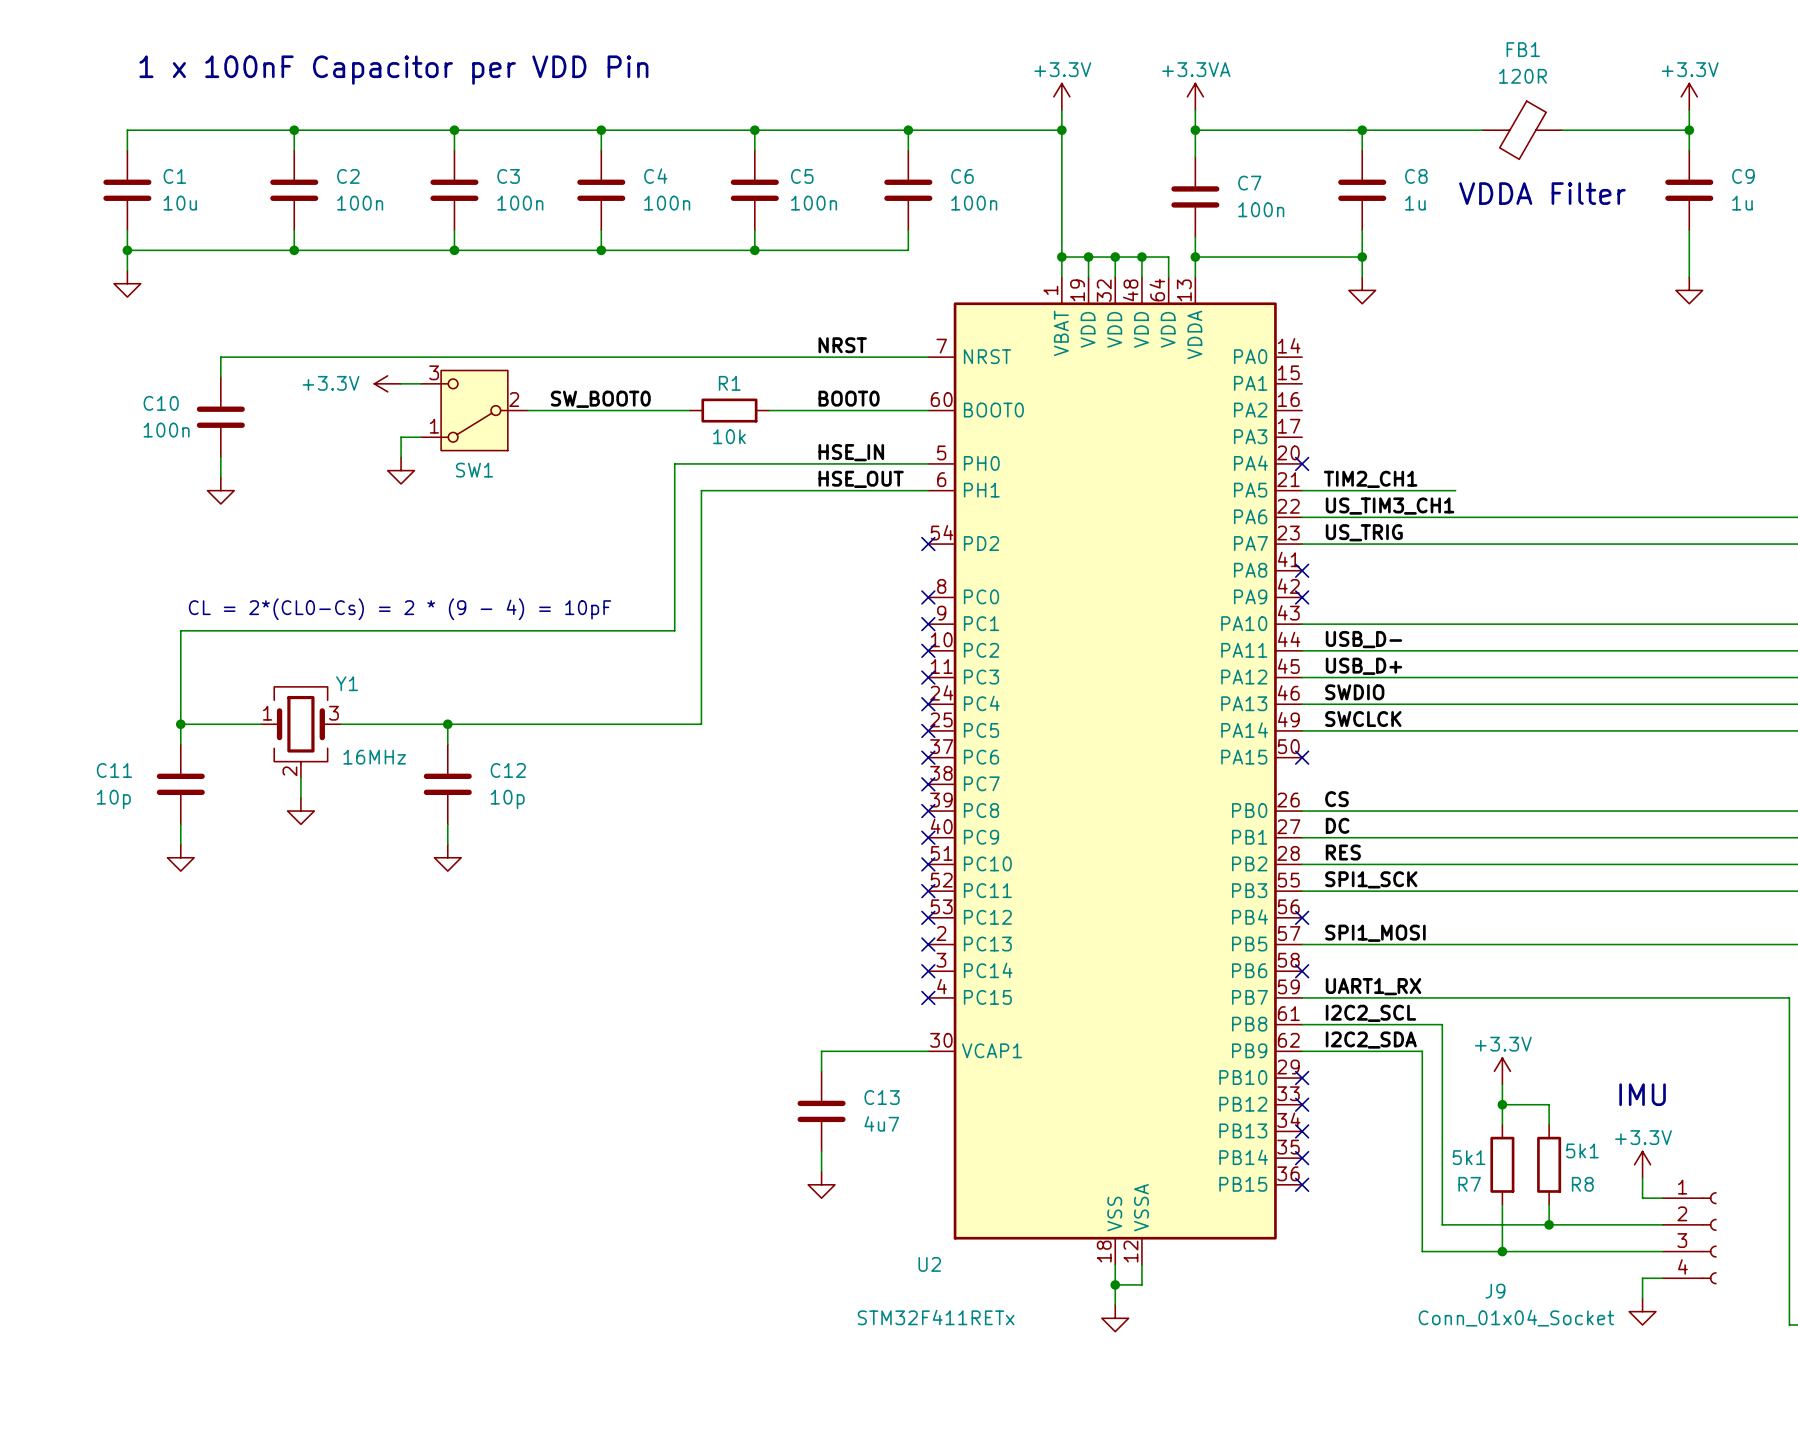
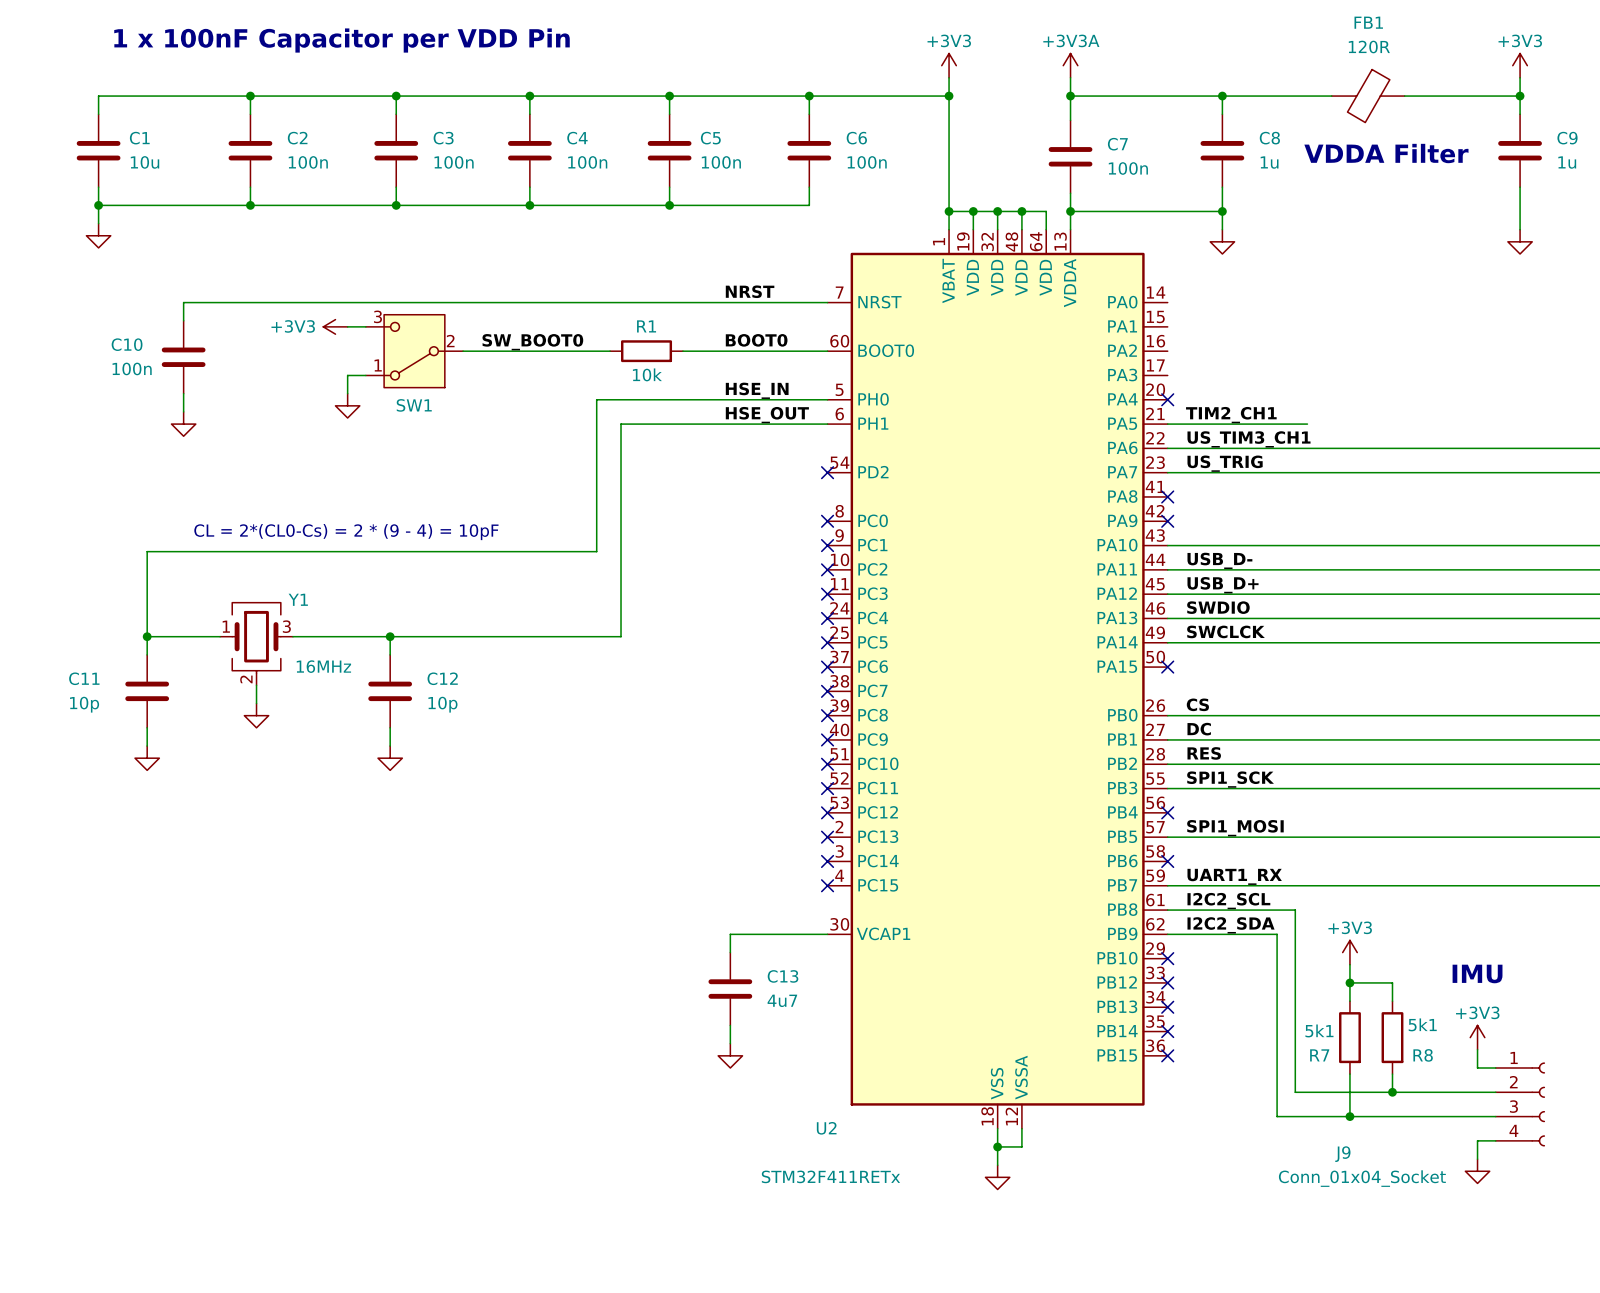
power symbol: +3.3V (1061, 96) -> +3V3 (949, 65)
power symbol: +3.3VA (1195, 96) -> +3V3A (1070, 65)
power symbol: +3.3V (1689, 96) -> +3V3 (1520, 65)
power symbol: +3.3V (387, 383) -> +3V3 (335, 326)
power symbol: +3.3V (1502, 1071) -> +3V3 (1349, 952)
power symbol: +3.3V (1642, 1164) -> +3V3 (1477, 1037)

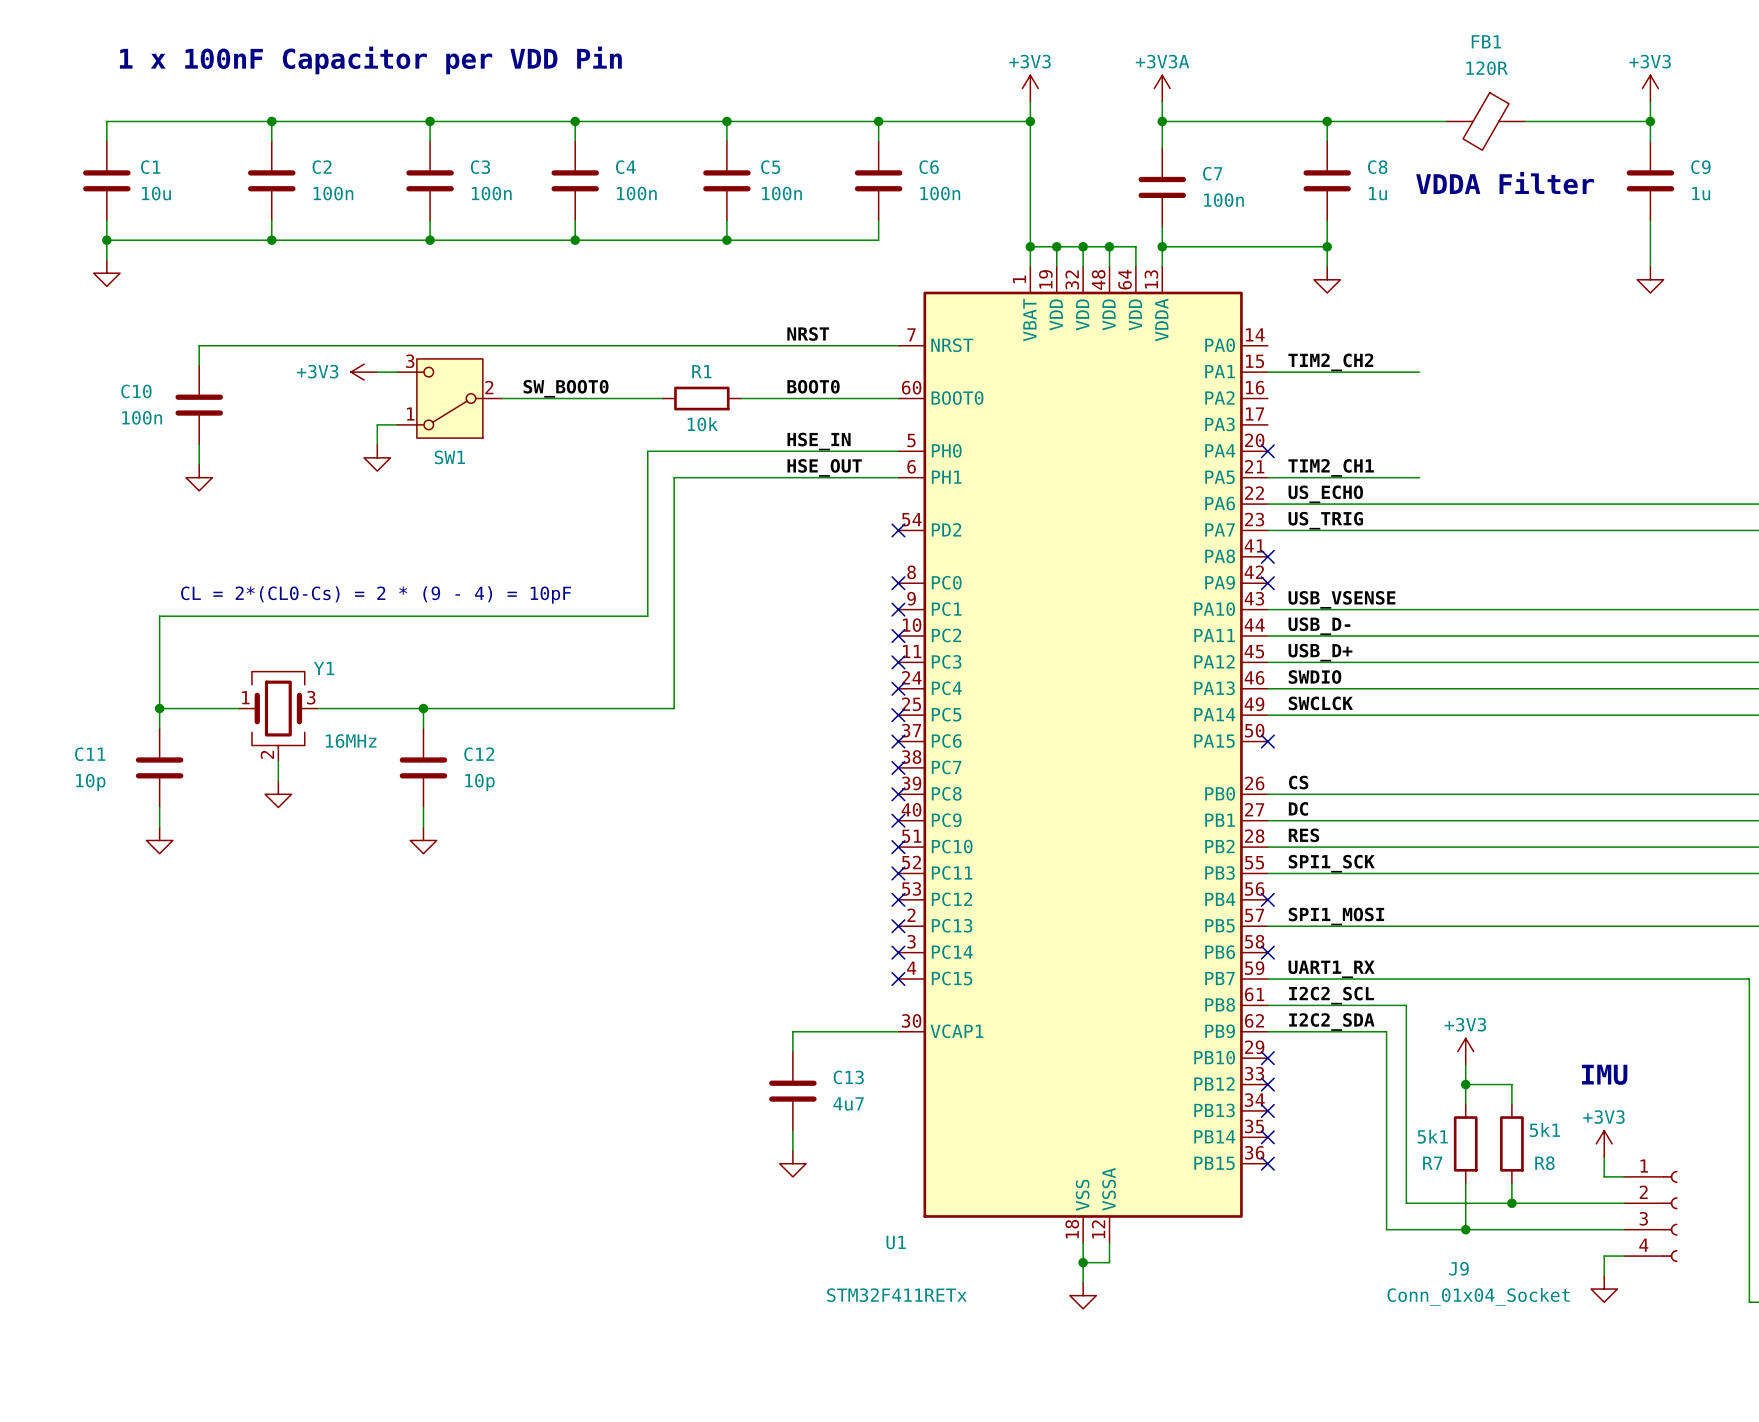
label: none -> TIM2_CH2 (1330, 362)
wire: none -> (1267, 372) (1419, 372)
label: US_TIM3_CH1 (1249, 439) -> US_ECHO (1325, 494)
label: none -> USB_VSENSE (1341, 599)
U2 name: U2 (826, 1128) -> U1 (896, 1242)

